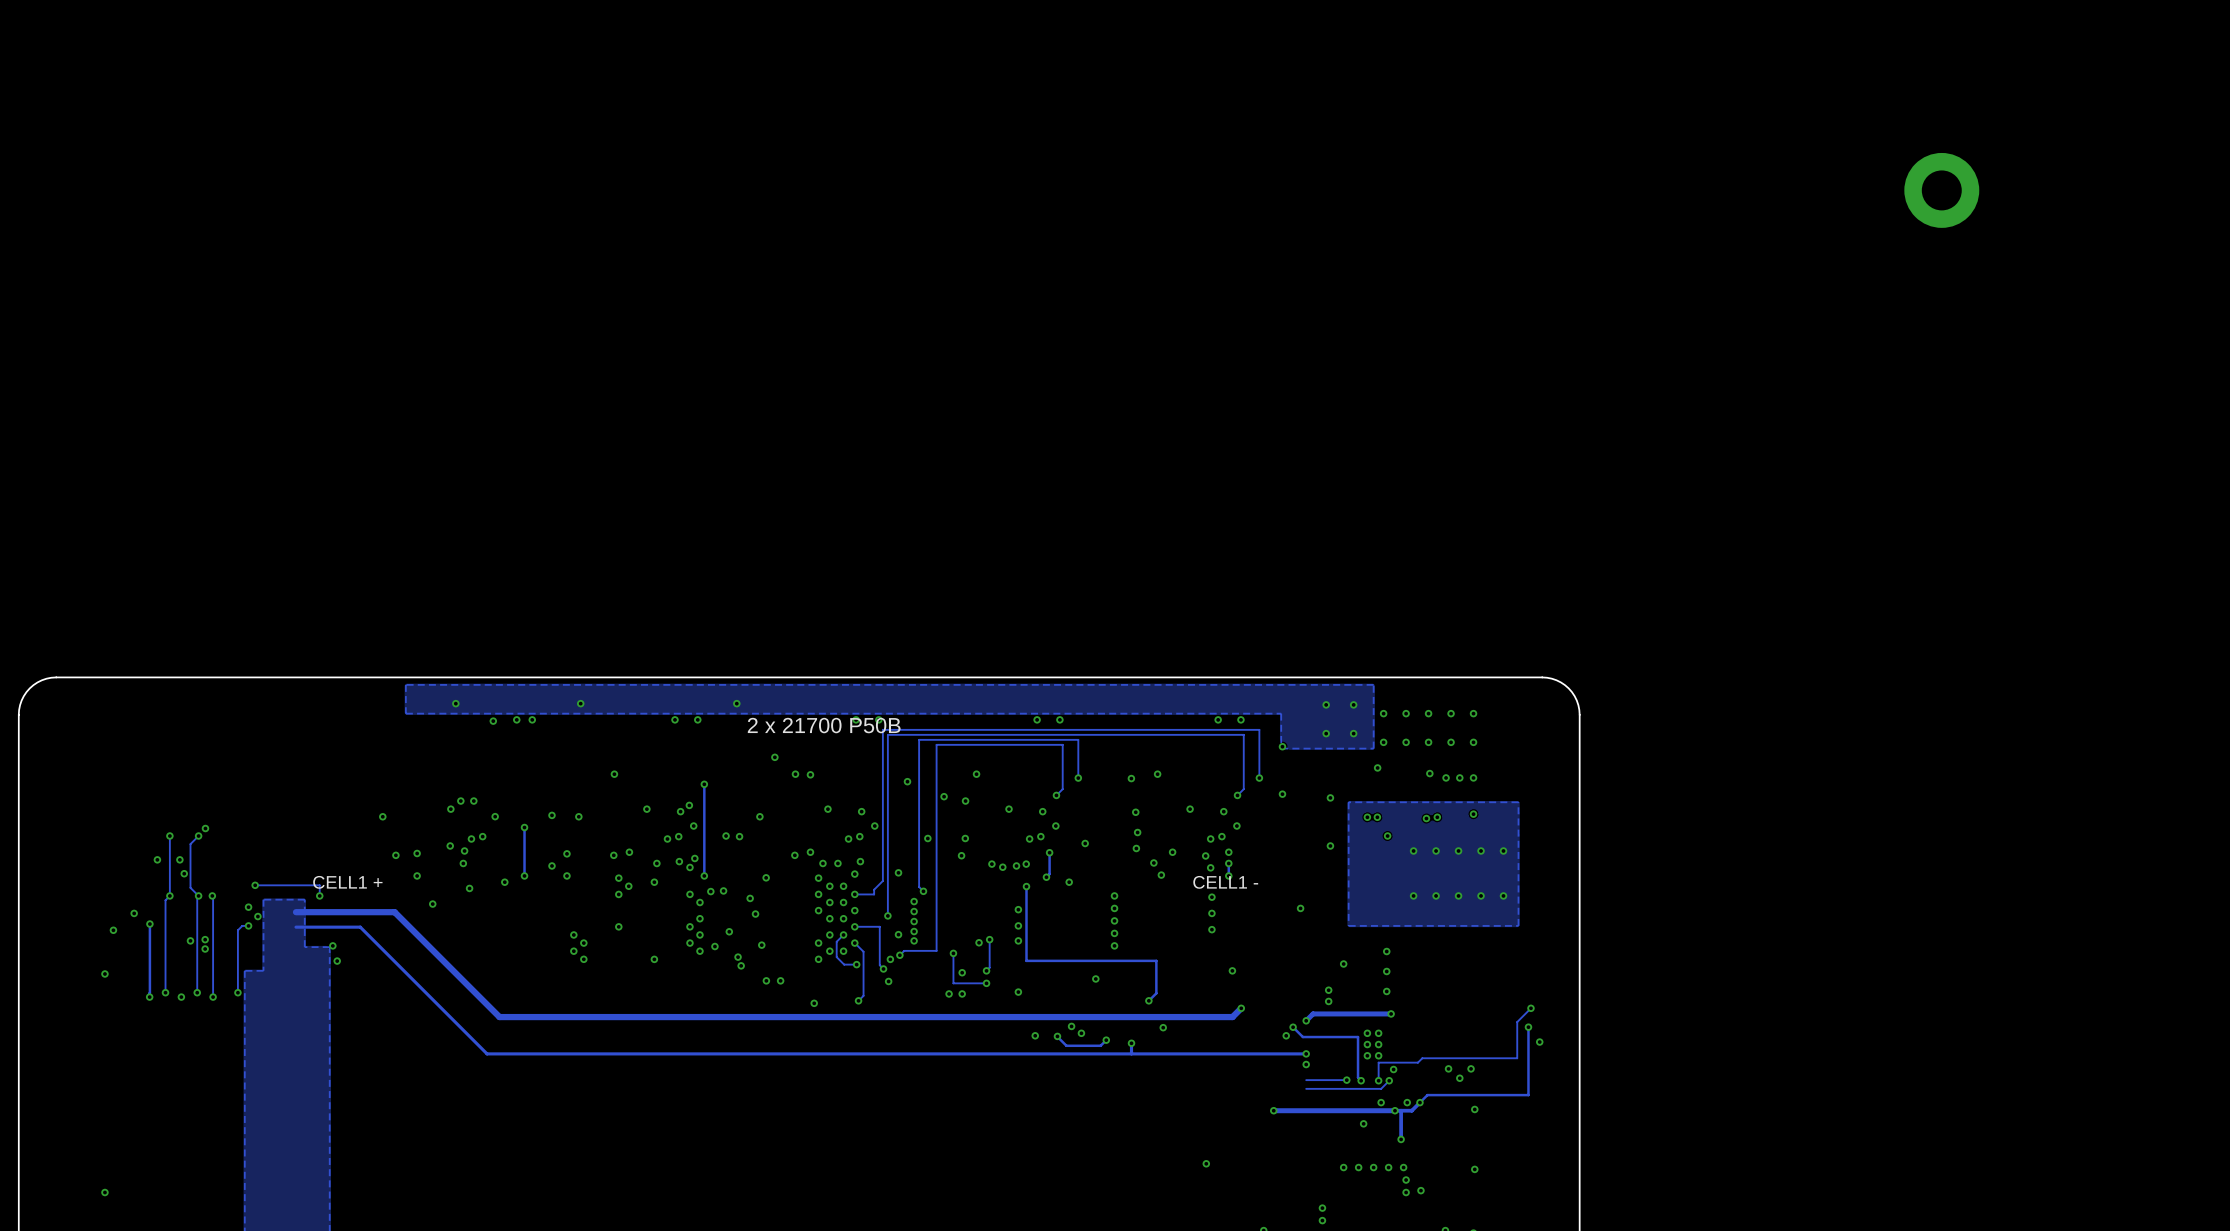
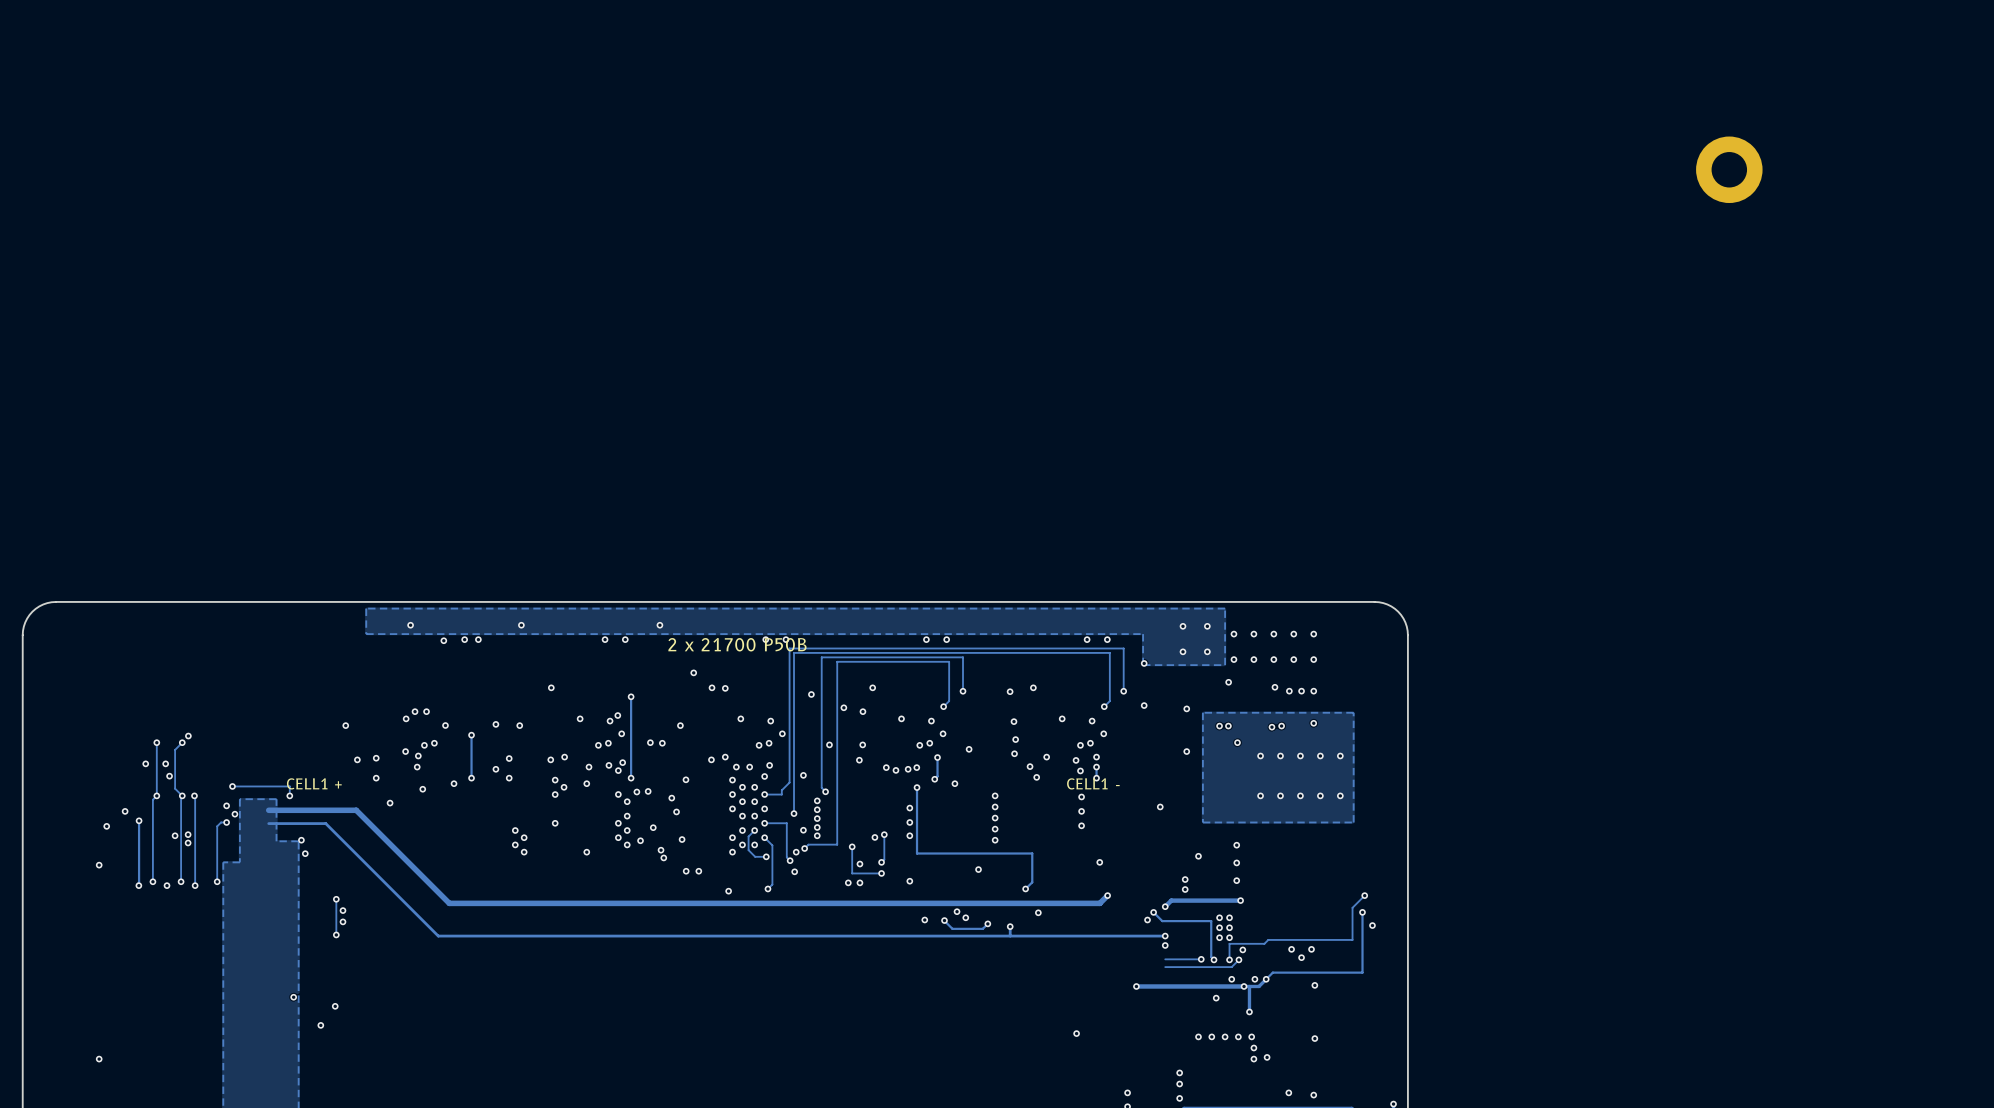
track: none -> (336, 899) (336, 934)
via: none -> (336, 899)
via: none -> (342, 910)
via: none -> (342, 921)
via: none -> (336, 934)
via: none -> (293, 997)
via: none -> (335, 1006)
via: none -> (320, 1025)

